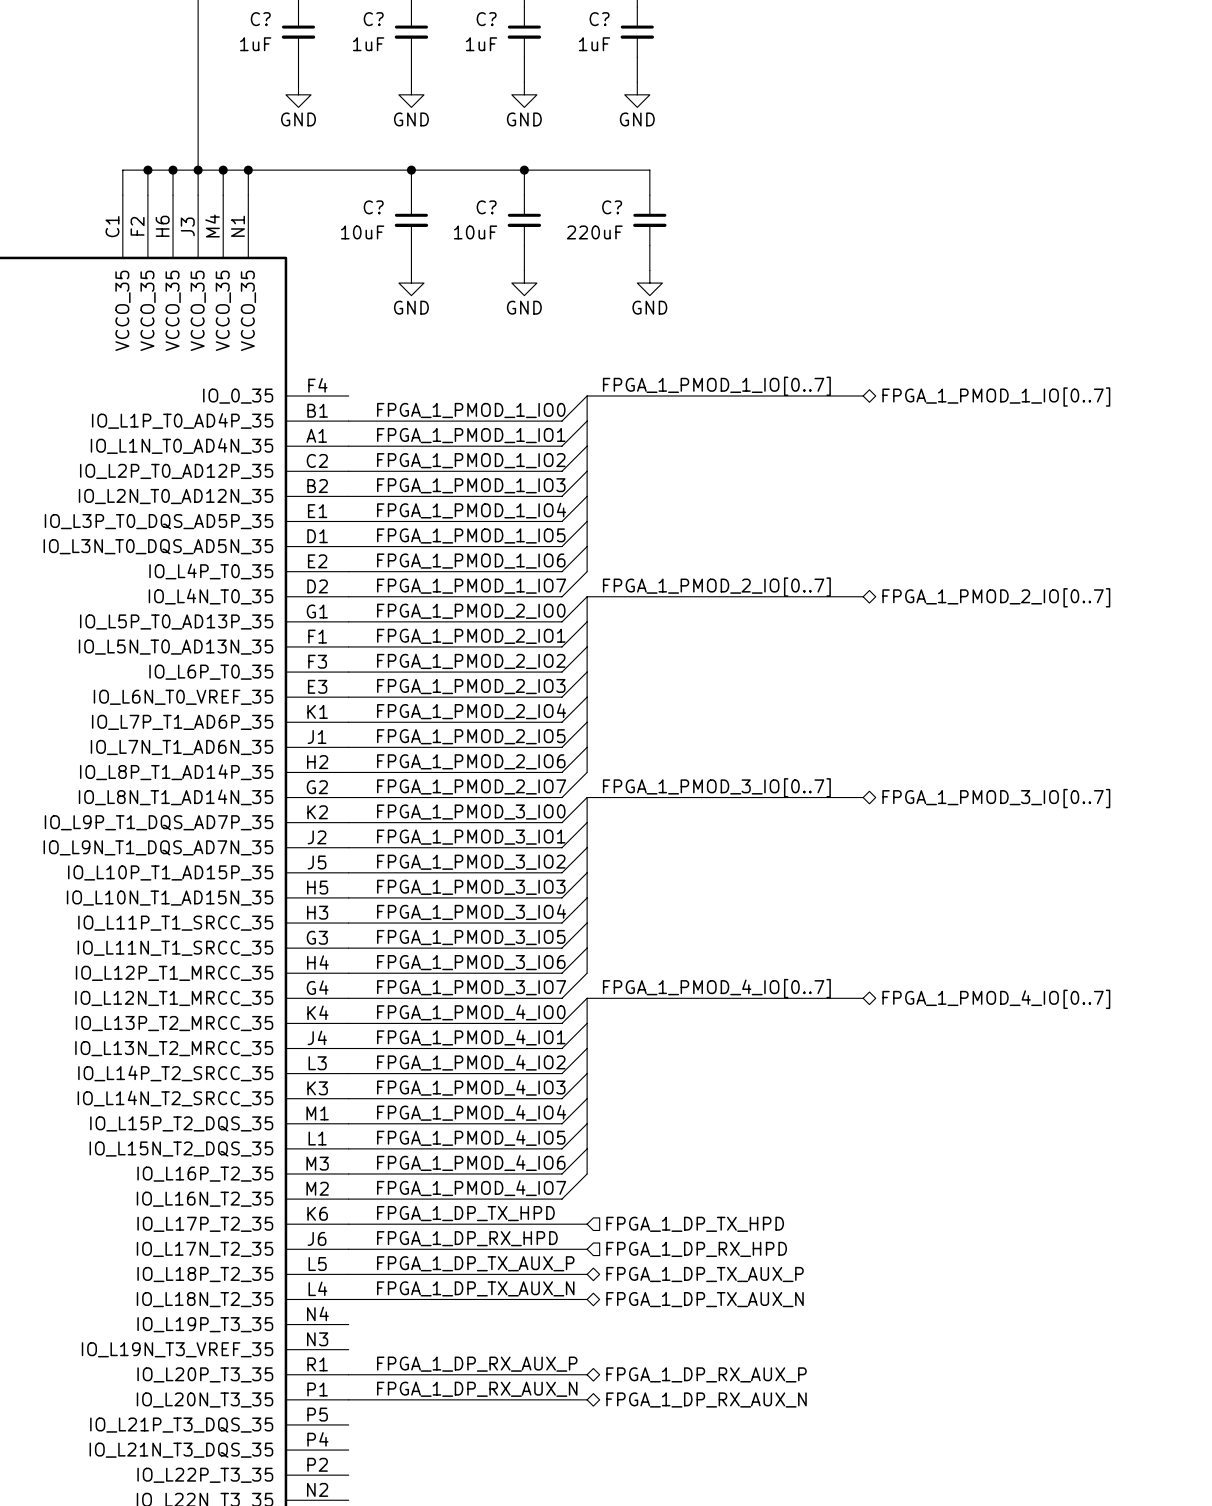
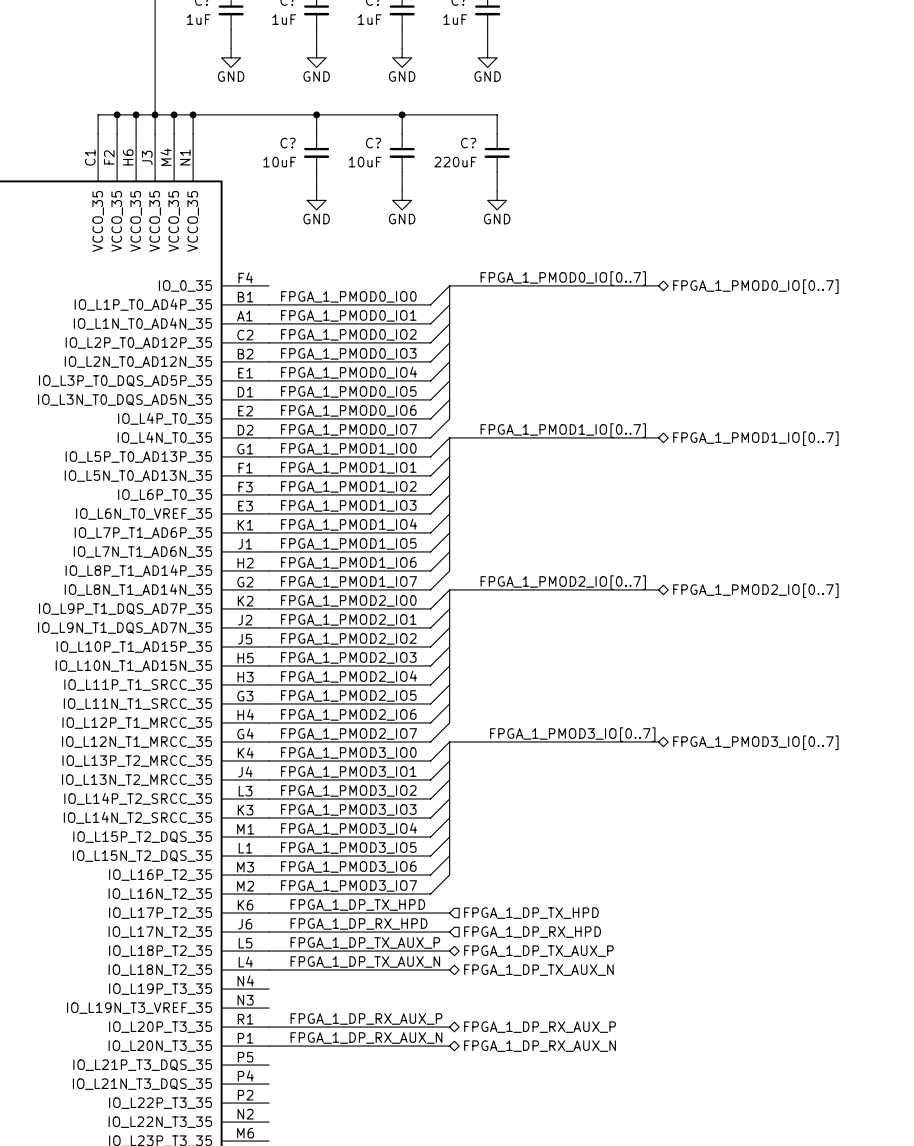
label: FPGA_1_PMOD_1_IO[0..7] (716, 386) -> FPGA_1_PMOD0_IO[0..7] (563, 278)
hierarchical label: FPGA_1_PMOD_1_IO[0..7] (996, 397) -> FPGA_1_PMOD0_IO[0..7] (755, 286)
label: FPGA_1_PMOD_1_IO0 (471, 410) -> FPGA_1_PMOD0_IO0 (348, 296)
label: FPGA_1_PMOD_1_IO1 (471, 435) -> FPGA_1_PMOD0_IO1 (348, 315)
label: FPGA_1_PMOD_1_IO2 (471, 460) -> FPGA_1_PMOD0_IO2 (348, 334)
label: FPGA_1_PMOD_1_IO3 (471, 485) -> FPGA_1_PMOD0_IO3 (348, 353)
label: FPGA_1_PMOD_1_IO4 (471, 510) -> FPGA_1_PMOD0_IO4 (349, 372)
label: FPGA_1_PMOD_1_IO5 (471, 535) -> FPGA_1_PMOD0_IO5 (348, 391)
label: FPGA_1_PMOD_1_IO6 (471, 561) -> FPGA_1_PMOD0_IO6 (348, 410)
label: FPGA_1_PMOD_1_IO7 (471, 586) -> FPGA_1_PMOD0_IO7 (349, 429)
label: FPGA_1_PMOD_2_IO[0..7] (716, 587) -> FPGA_1_PMOD1_IO[0..7] (563, 430)
hierarchical label: FPGA_1_PMOD_2_IO[0..7] (996, 597) -> FPGA_1_PMOD1_IO[0..7] (755, 438)
label: FPGA_1_PMOD_2_IO0 (471, 611) -> FPGA_1_PMOD1_IO0 (348, 448)
label: FPGA_1_PMOD_2_IO1 (471, 636) -> FPGA_1_PMOD1_IO1 (348, 467)
label: FPGA_1_PMOD_2_IO2 (471, 661) -> FPGA_1_PMOD1_IO2 (348, 486)
label: FPGA_1_PMOD_2_IO3 (471, 686) -> FPGA_1_PMOD1_IO3 (348, 505)
label: FPGA_1_PMOD_2_IO4 (471, 711) -> FPGA_1_PMOD1_IO4 (349, 524)
label: FPGA_1_PMOD_2_IO5 (471, 736) -> FPGA_1_PMOD1_IO5 (348, 543)
label: FPGA_1_PMOD_2_IO6 (471, 761) -> FPGA_1_PMOD1_IO6 (348, 562)
label: FPGA_1_PMOD_2_IO7 (471, 786) -> FPGA_1_PMOD1_IO7 (349, 581)
label: FPGA_1_PMOD_3_IO[0..7] (716, 787) -> FPGA_1_PMOD2_IO[0..7] (563, 582)
hierarchical label: FPGA_1_PMOD_3_IO[0..7] (996, 798) -> FPGA_1_PMOD2_IO[0..7] (755, 590)
label: FPGA_1_PMOD_3_IO0 (471, 812) -> FPGA_1_PMOD2_IO0 (348, 600)
label: FPGA_1_PMOD_3_IO1 (471, 837) -> FPGA_1_PMOD2_IO1 (348, 619)
label: FPGA_1_PMOD_3_IO2 (471, 862) -> FPGA_1_PMOD2_IO2 (348, 638)
label: FPGA_1_PMOD_3_IO3 (471, 887) -> FPGA_1_PMOD2_IO3 (348, 657)
label: FPGA_1_PMOD_3_IO4 (471, 912) -> FPGA_1_PMOD2_IO4 (349, 676)
label: FPGA_1_PMOD_3_IO5 (471, 937) -> FPGA_1_PMOD2_IO5 (348, 695)
label: FPGA_1_PMOD_3_IO6 (471, 962) -> FPGA_1_PMOD2_IO6 (348, 714)
label: FPGA_1_PMOD_3_IO7 (471, 987) -> FPGA_1_PMOD2_IO7 (349, 733)
label: FPGA_1_PMOD_4_IO[0..7] (716, 988) -> FPGA_1_PMOD3_IO[0..7] (572, 734)
hierarchical label: FPGA_1_PMOD_4_IO[0..7] (996, 999) -> FPGA_1_PMOD3_IO[0..7] (755, 742)
label: FPGA_1_PMOD_4_IO0 (471, 1012) -> FPGA_1_PMOD3_IO0 (348, 752)
label: FPGA_1_PMOD_4_IO1 (471, 1037) -> FPGA_1_PMOD3_IO1 (348, 771)
label: FPGA_1_PMOD_4_IO2 (471, 1062) -> FPGA_1_PMOD3_IO2 (348, 790)
label: FPGA_1_PMOD_4_IO3 (471, 1087) -> FPGA_1_PMOD3_IO3 (348, 809)
label: FPGA_1_PMOD_4_IO4 (471, 1112) -> FPGA_1_PMOD3_IO4 (349, 828)
label: FPGA_1_PMOD_4_IO5 (471, 1137) -> FPGA_1_PMOD3_IO5 (348, 847)
label: FPGA_1_PMOD_4_IO6 (471, 1163) -> FPGA_1_PMOD3_IO6 (348, 866)
label: FPGA_1_PMOD_4_IO7 (471, 1188) -> FPGA_1_PMOD3_IO7 (349, 885)

